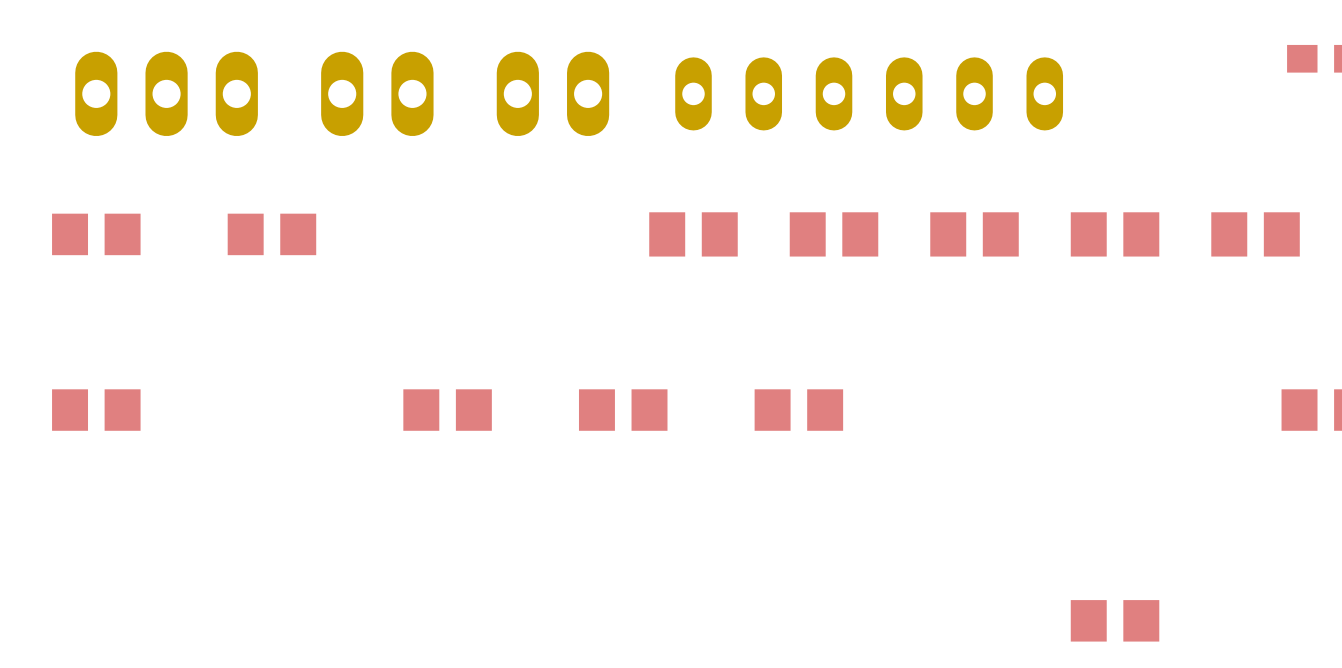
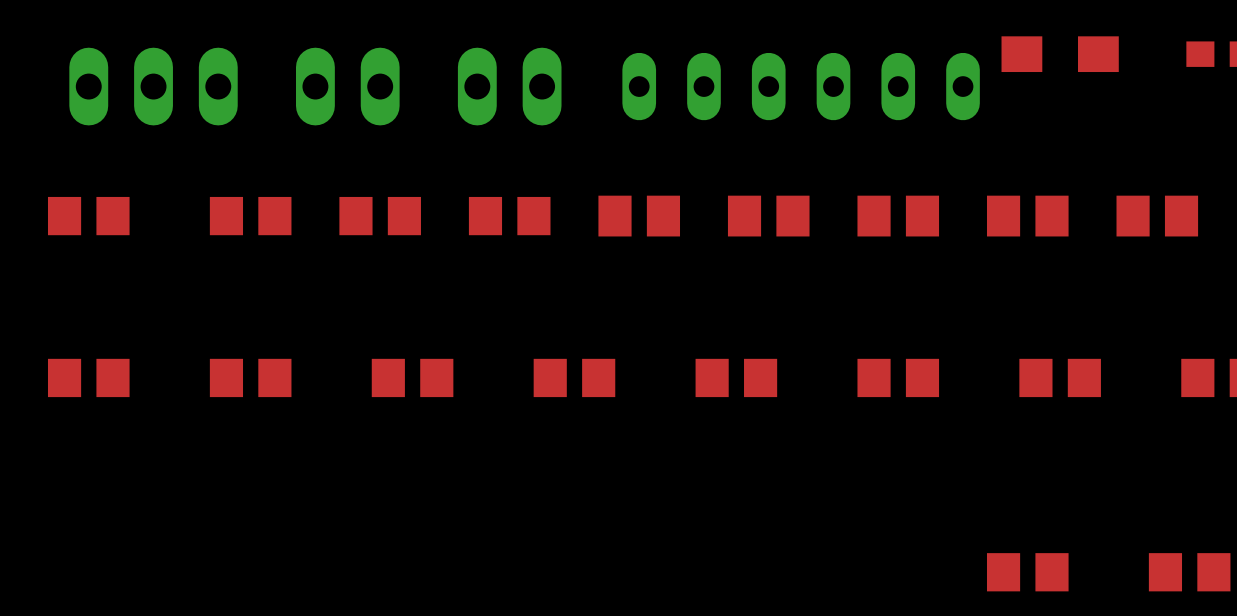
part: none -> (1060, 54)
part: none -> (380, 216)
part: none -> (509, 216)
part: none -> (250, 377)
part: none -> (898, 377)
part: none -> (1060, 377)
part: none -> (1189, 572)

